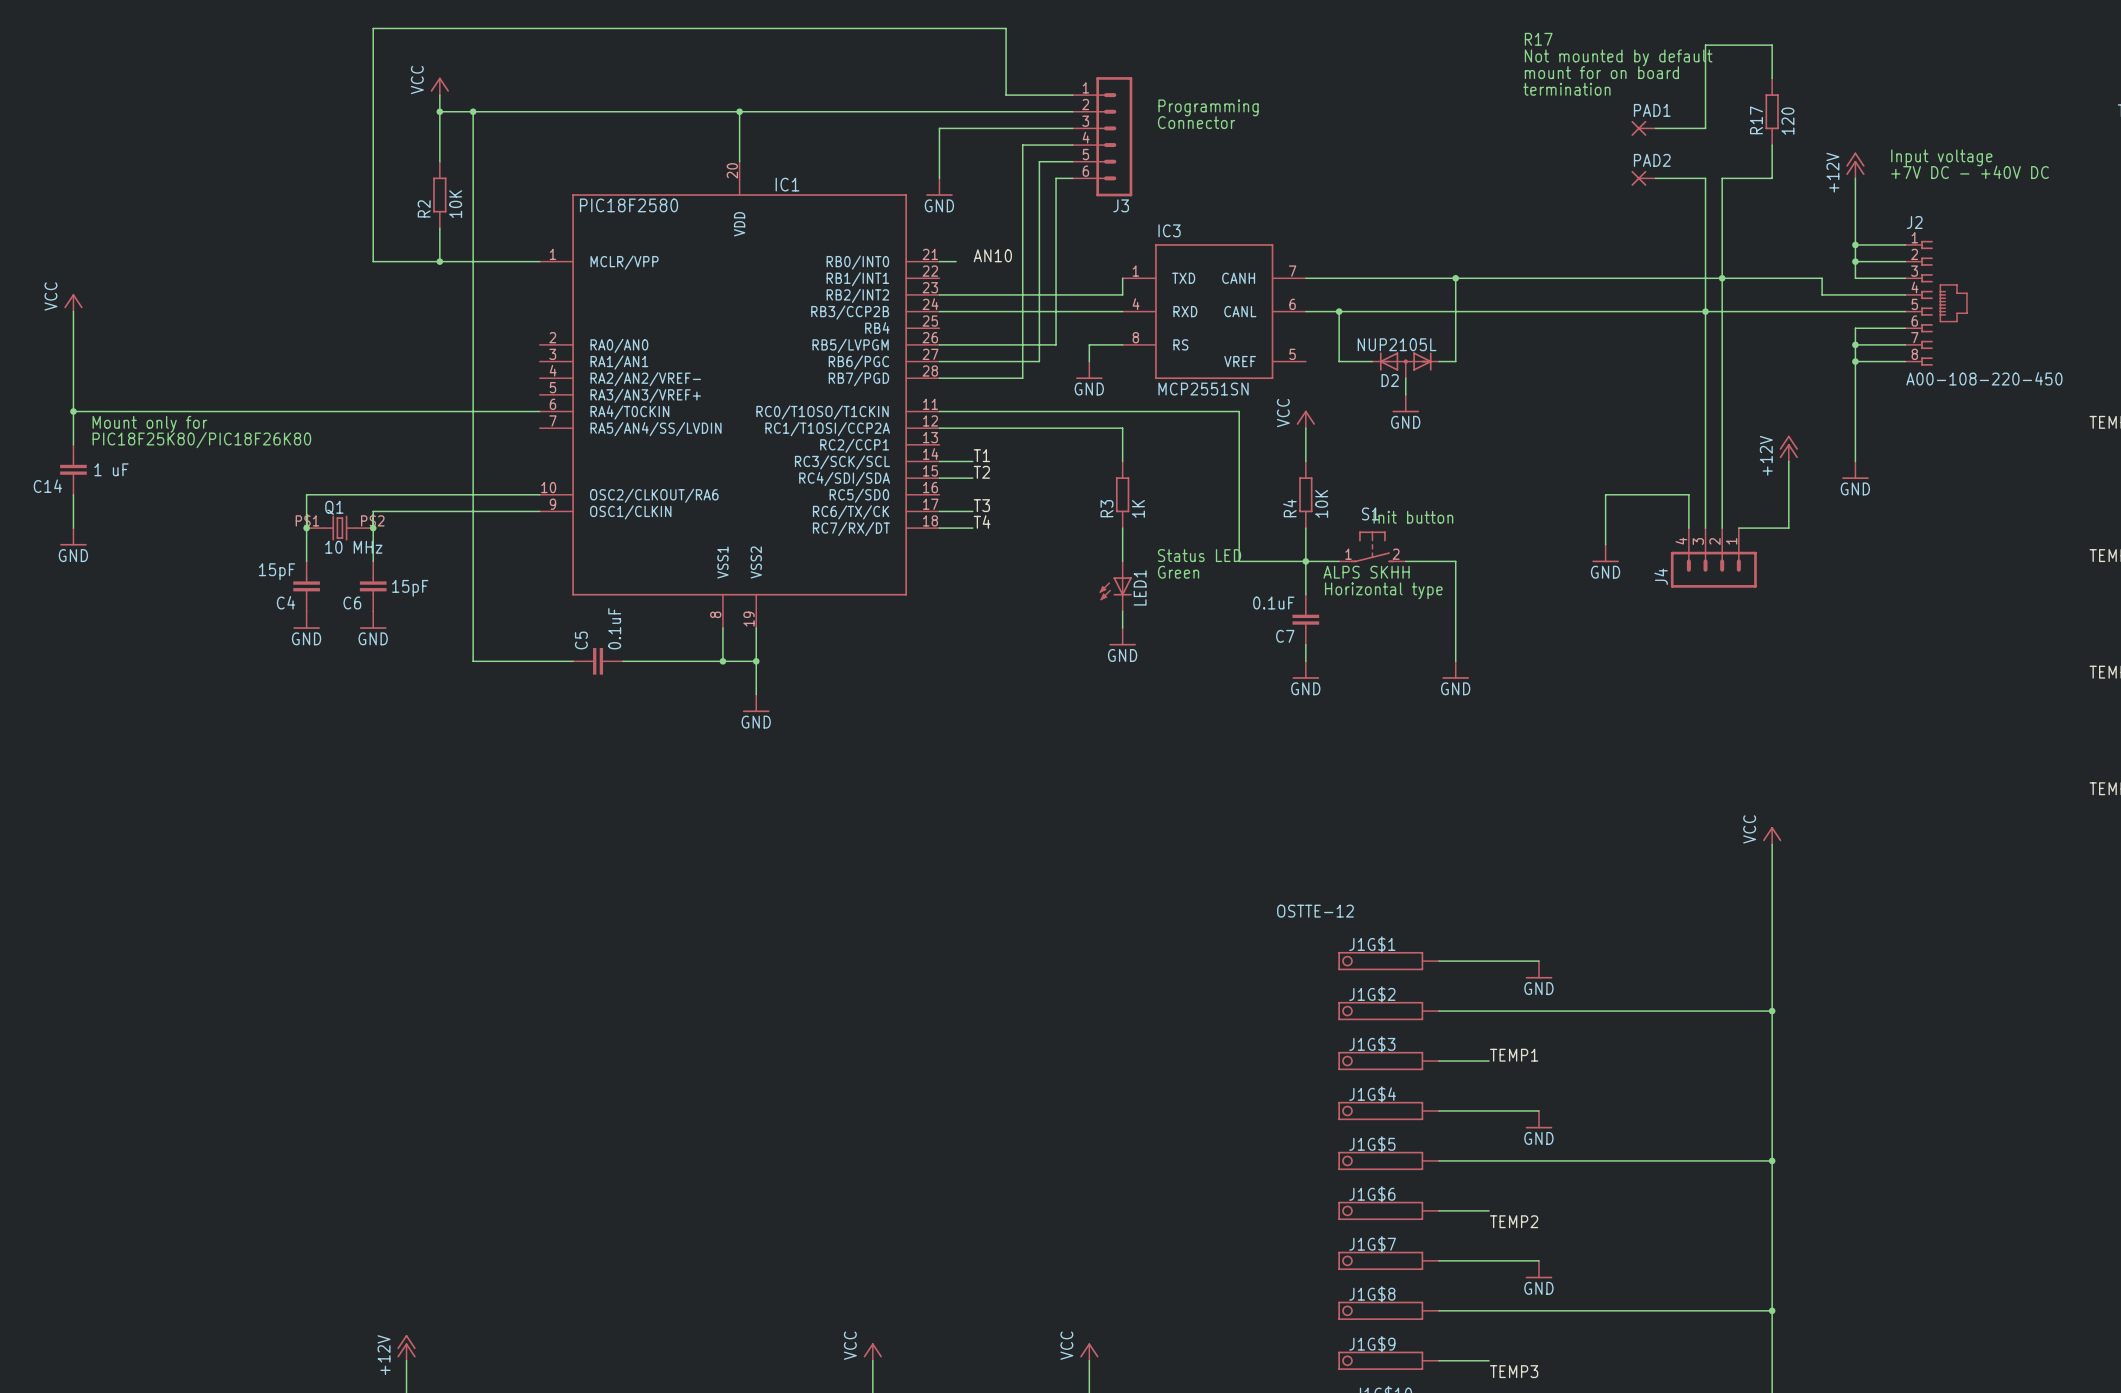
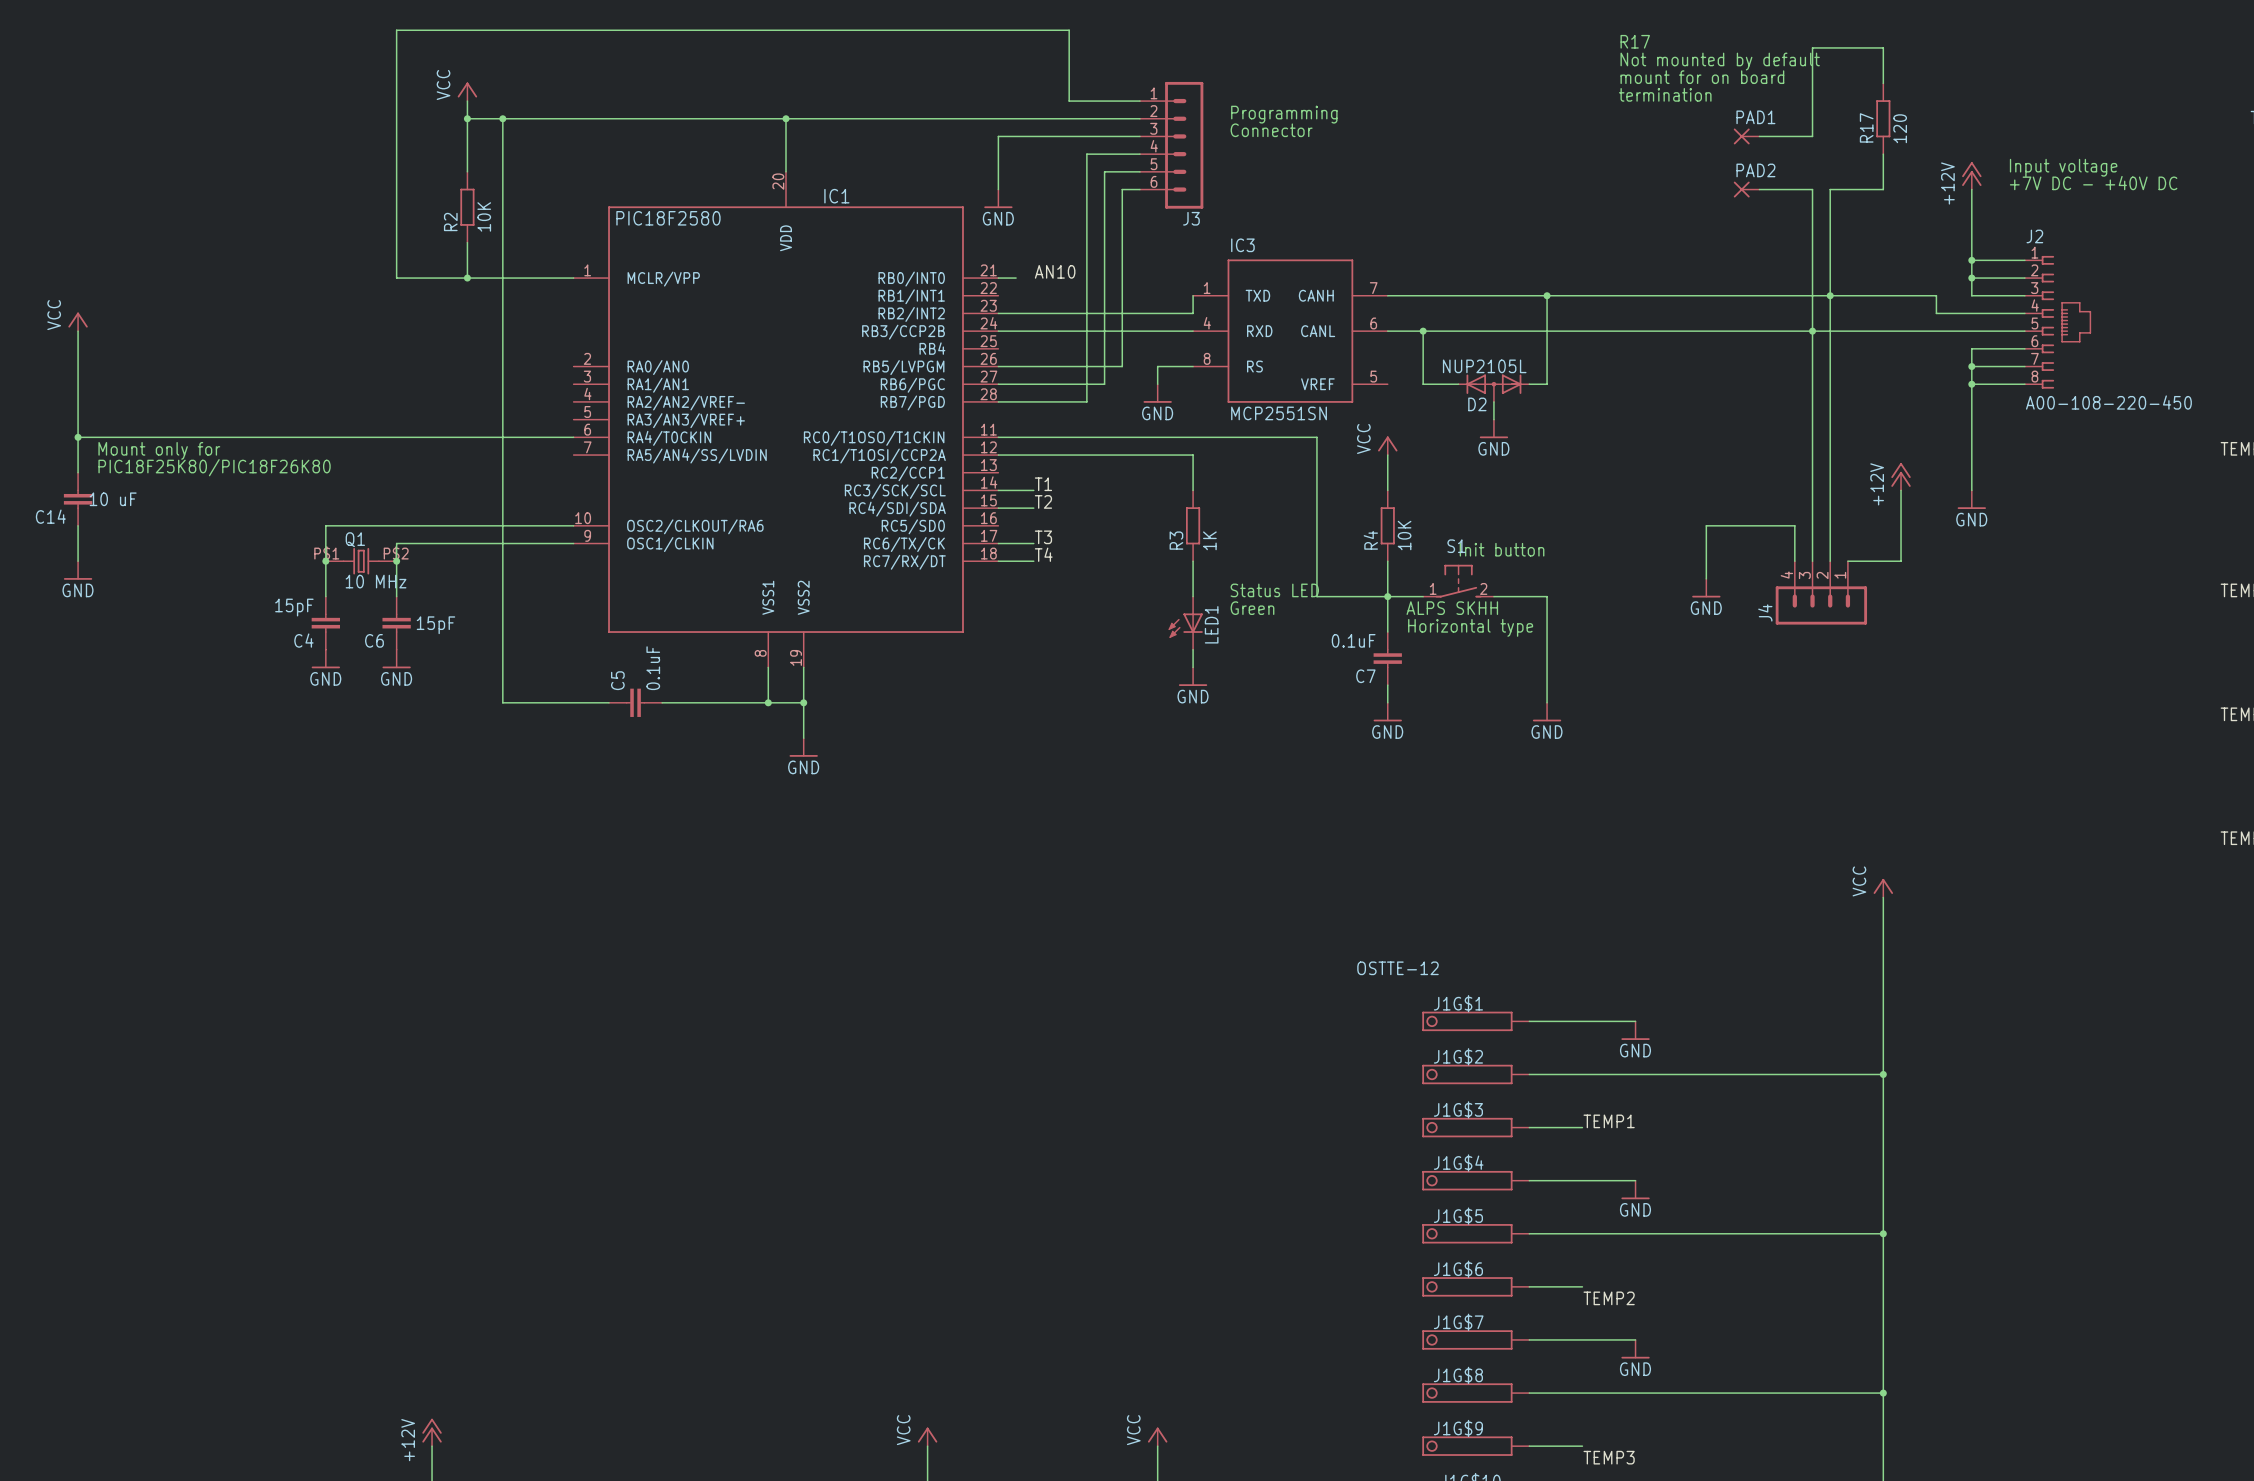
C14 value: 1 uF (111, 469) -> 10 uF (113, 499)

